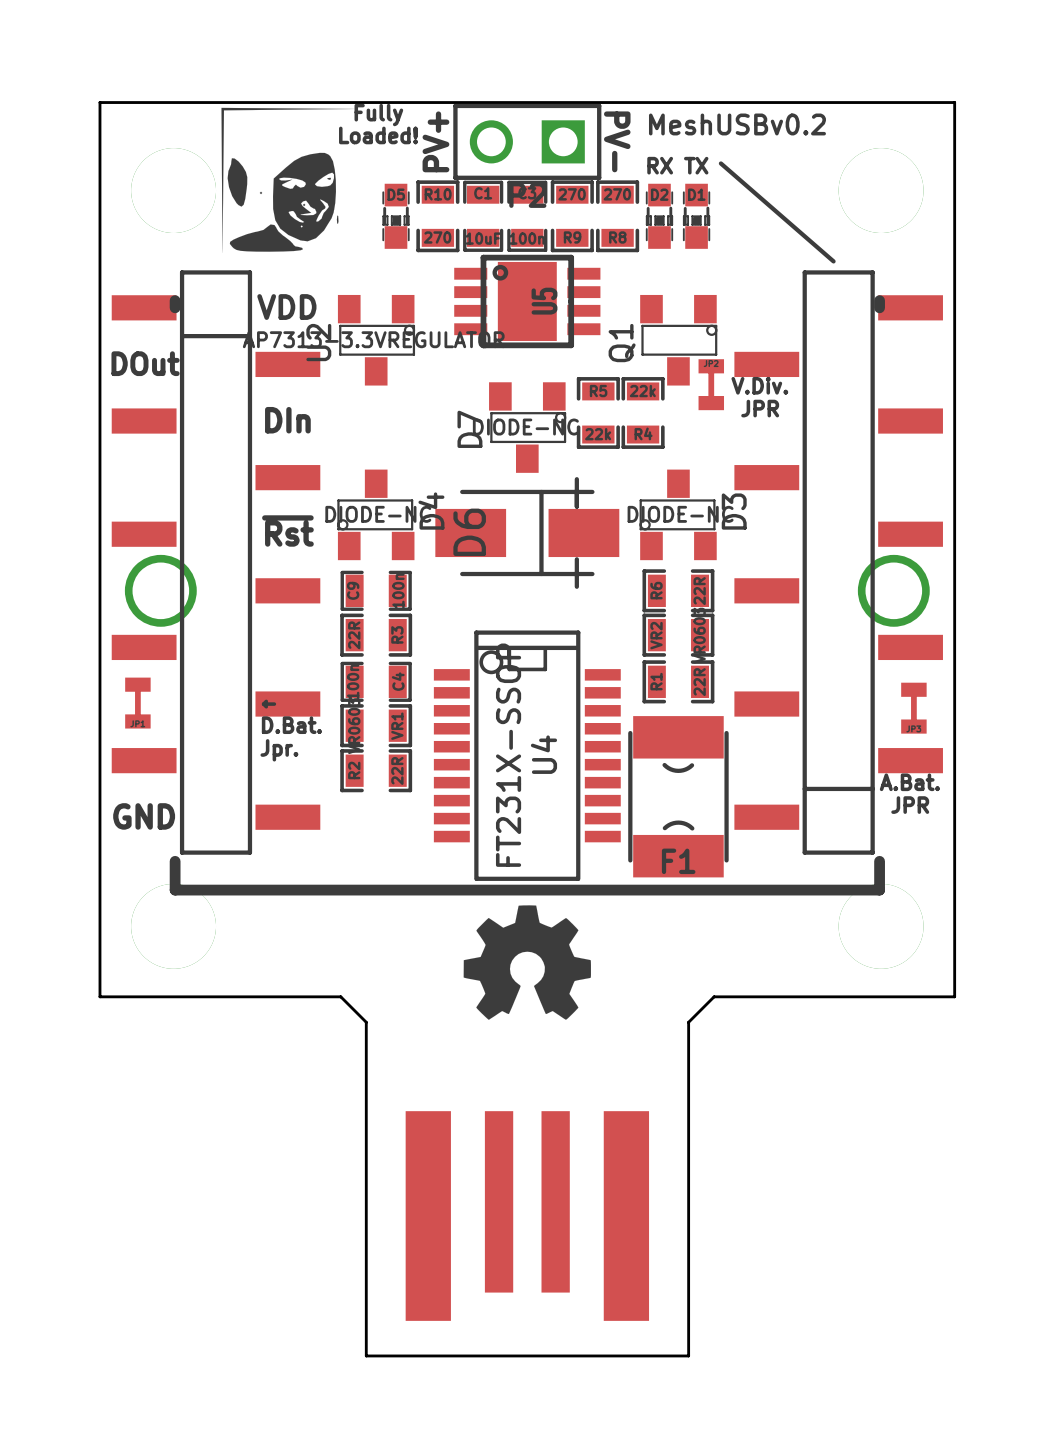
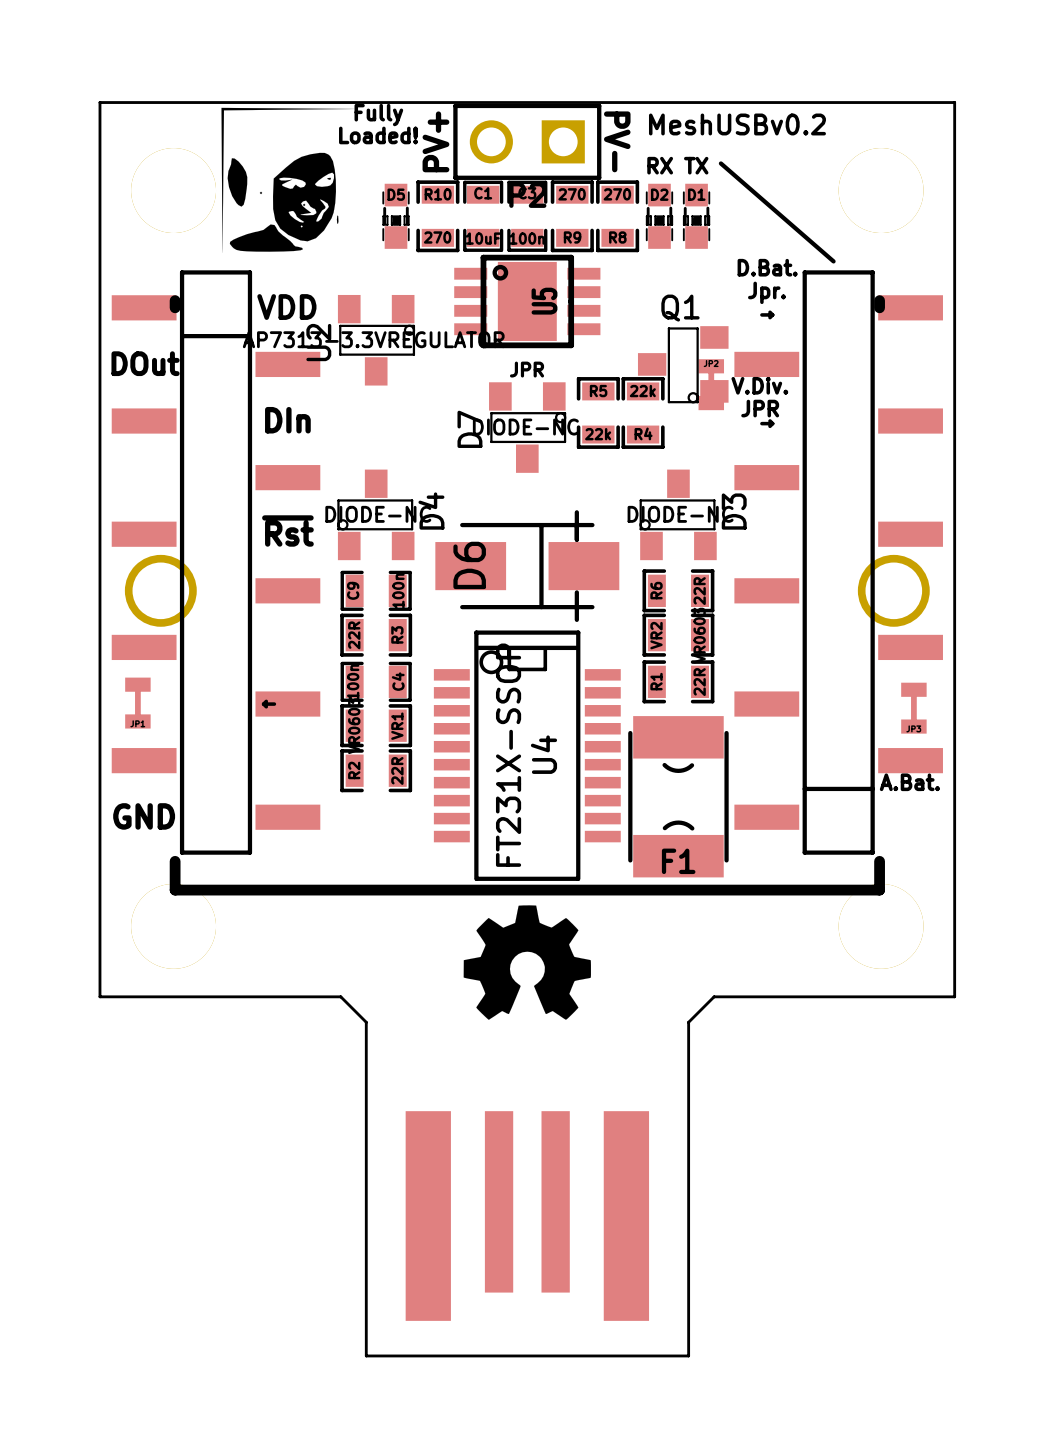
text: none -> → (767, 314)
Q1 rotation: 0° (678, 340) -> 90° clockwise (683, 364)
text: none -> → (767, 423)
D6 position: (527, 532) -> (527, 566)
text position: D.Bat. (291, 725) -> D.Bat. (767, 267)
text position: Jpr. (279, 750) -> Jpr. (766, 292)
text position: JPR (910, 805) -> JPR (527, 369)

